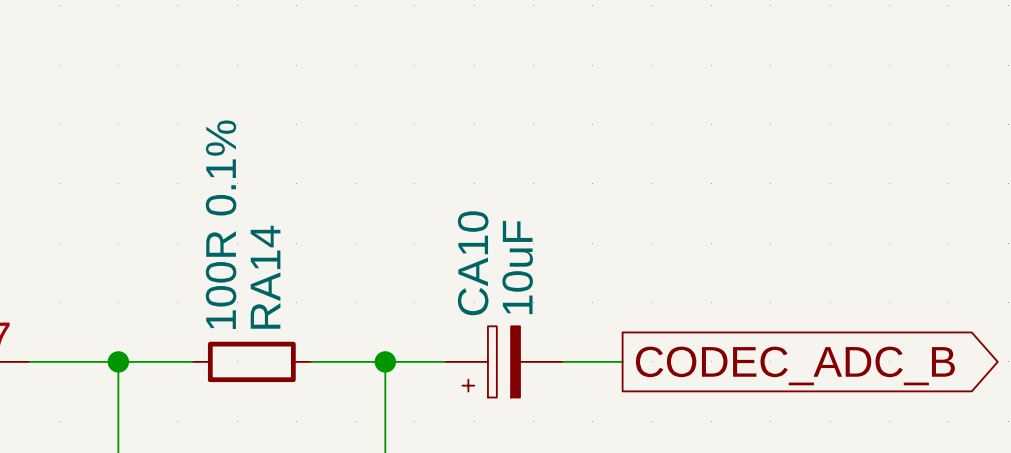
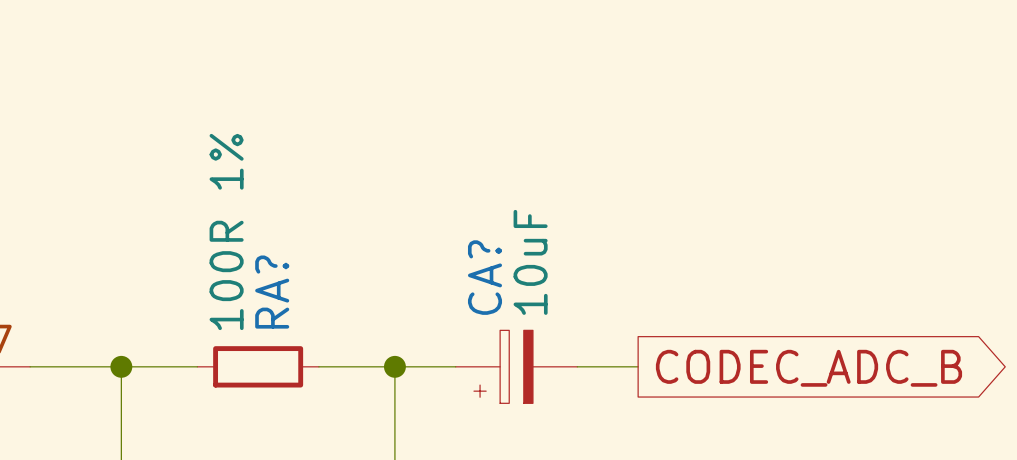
RA14 value: 100R 0.1% (221, 224) -> 100R 1% (226, 231)
CA10 name: CA10 (473, 263) -> CA? (484, 277)
RA14 name: RA14 (265, 277) -> RA? (272, 292)

